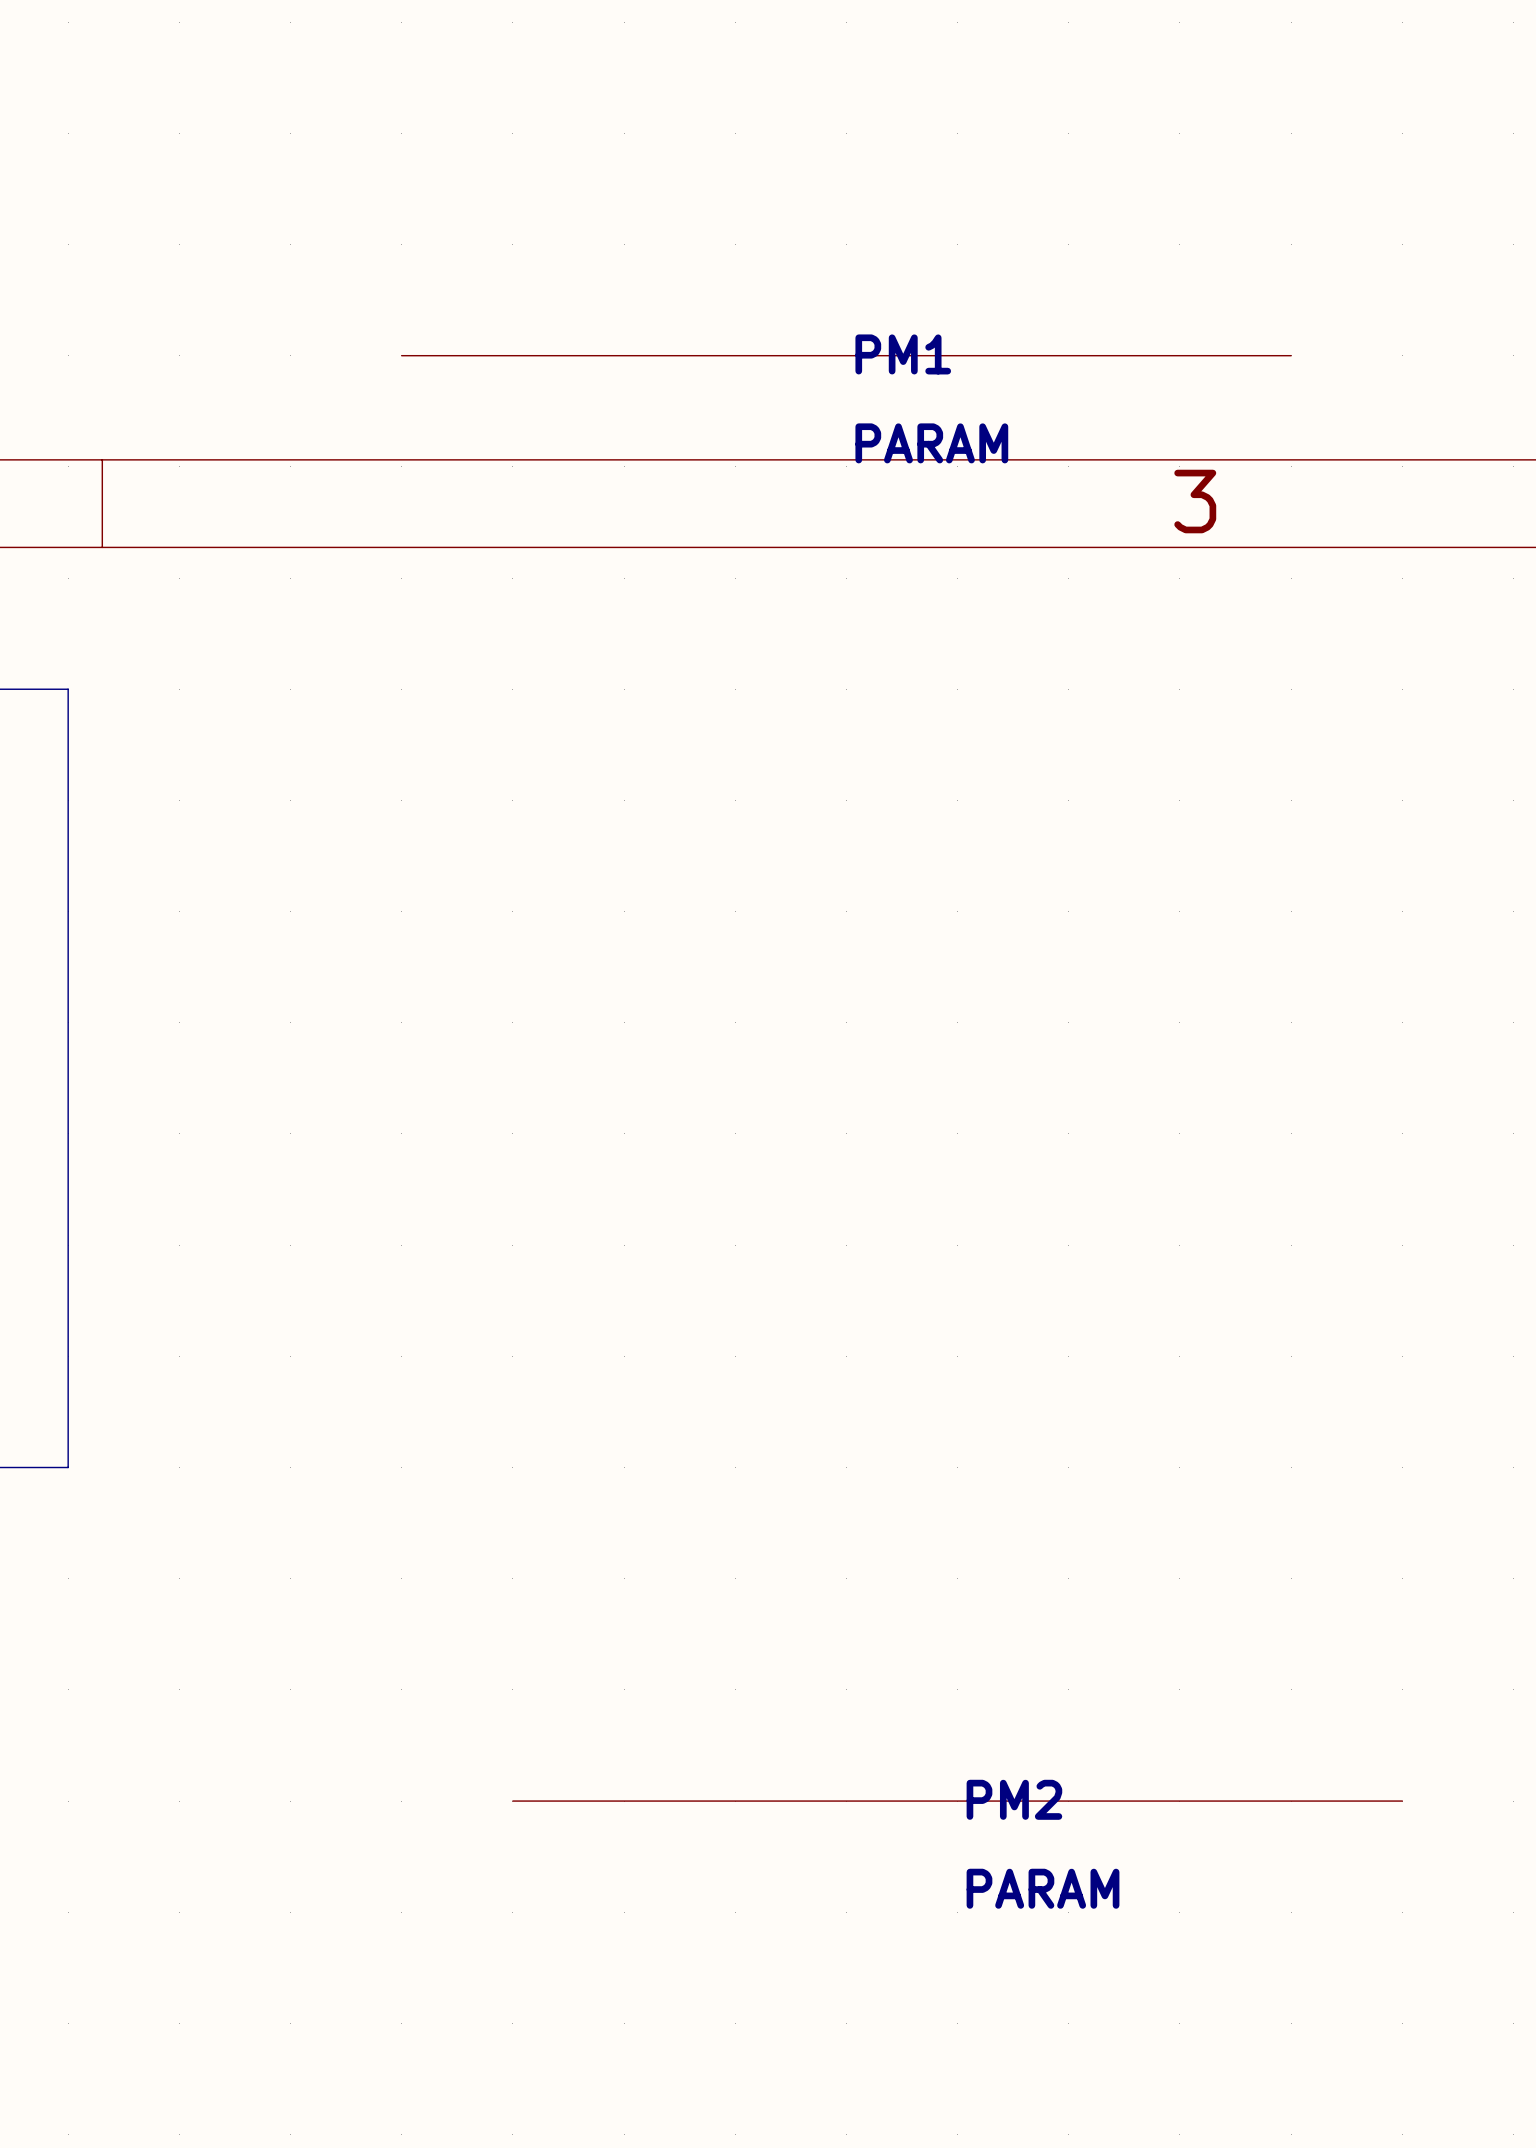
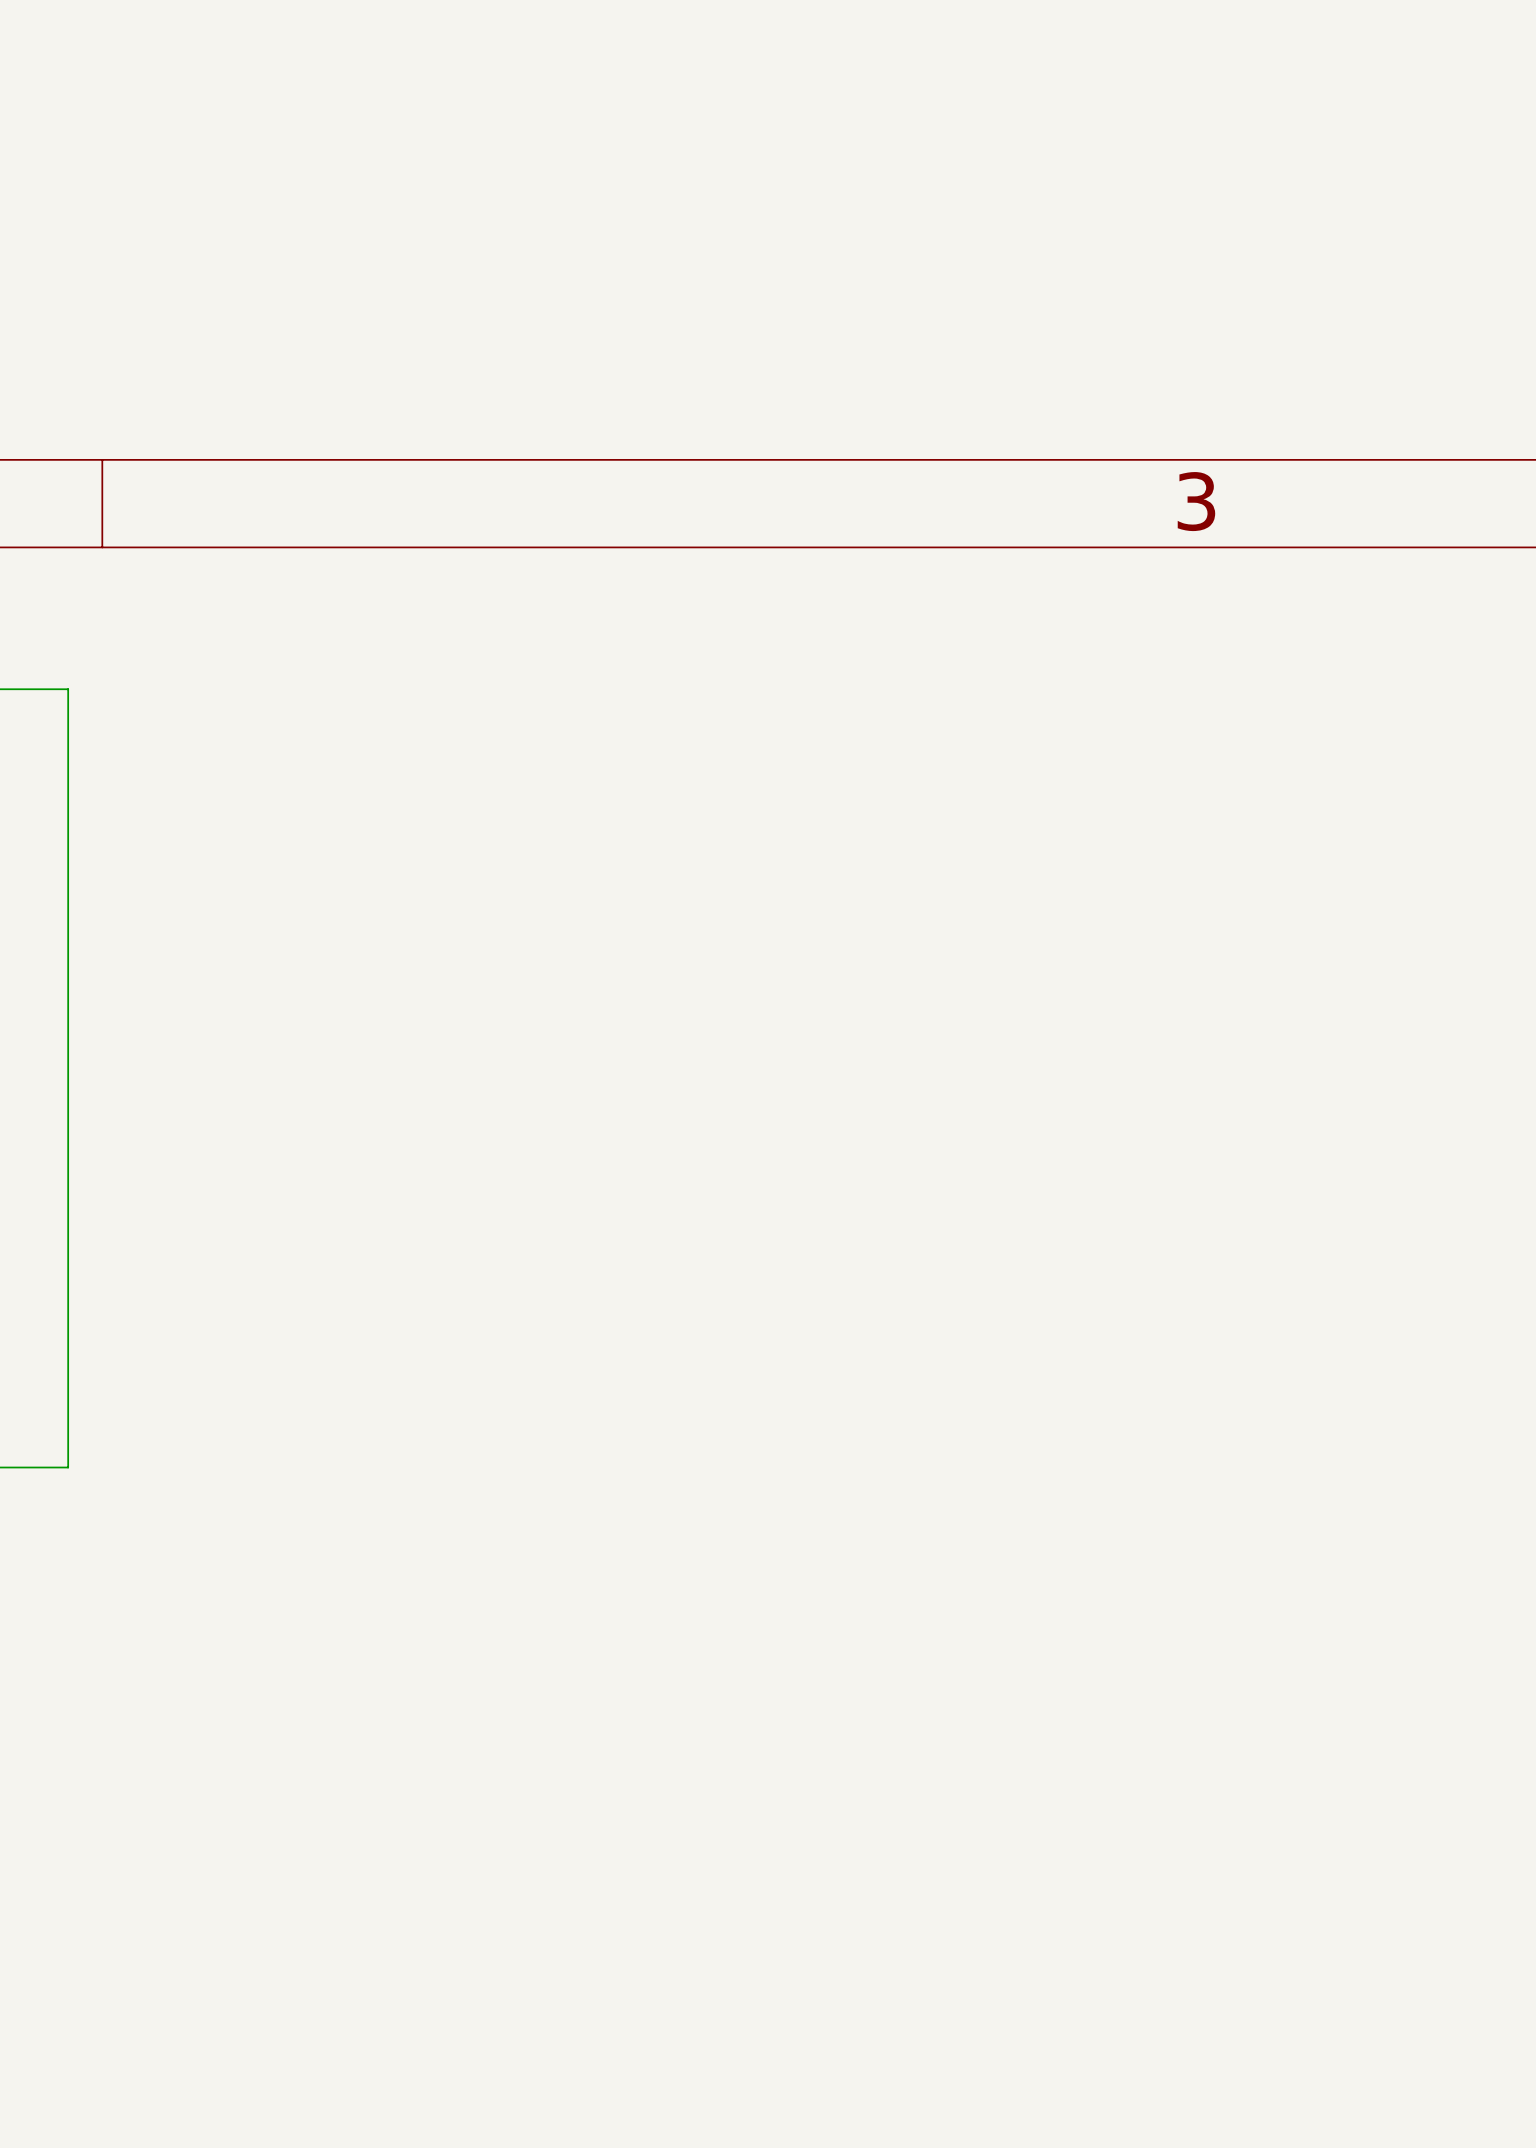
PM1: PARAM (846, 355) -> none
PM2: PARAM (957, 1801) -> none

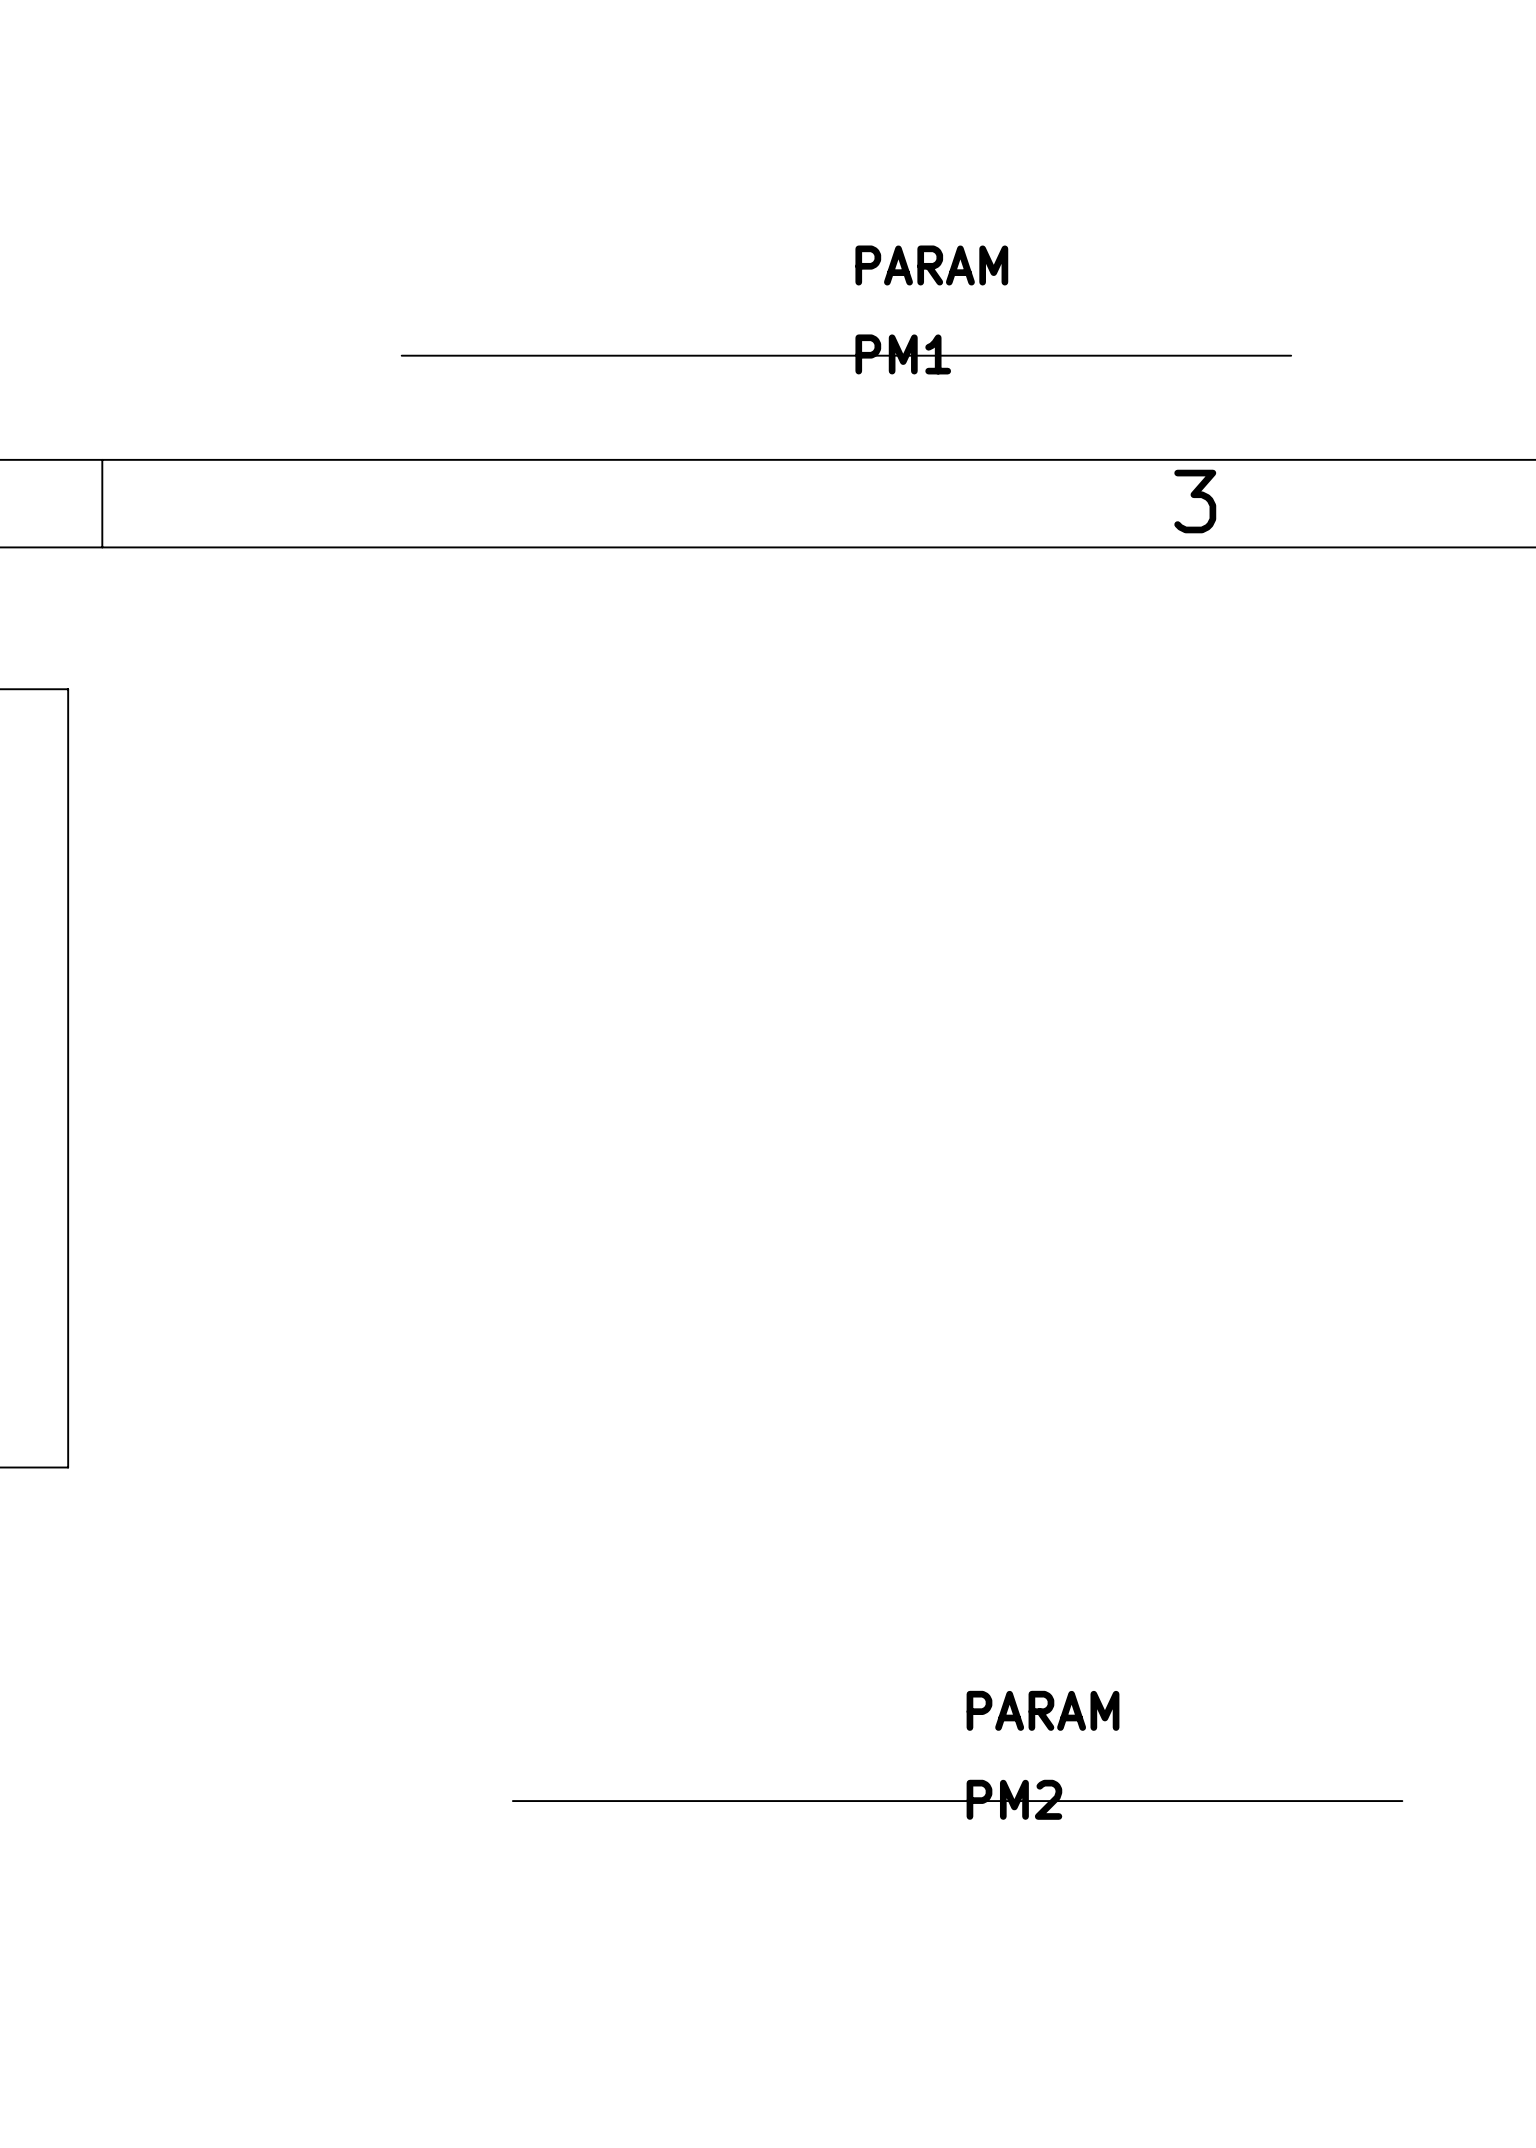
PM1: none -> PARAM (846, 355)
PM2: none -> PARAM (957, 1801)

